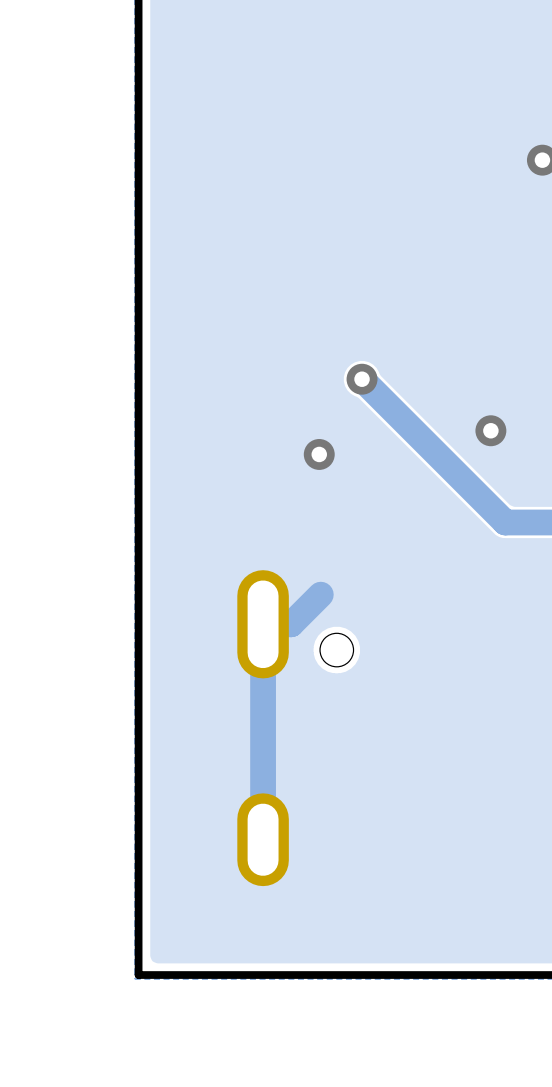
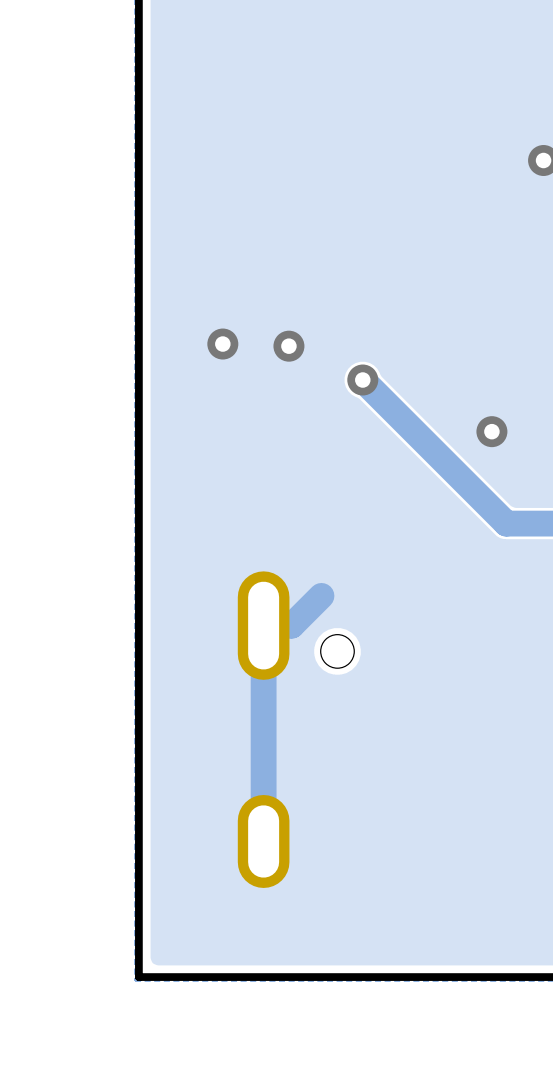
via: none -> (222, 344)
via: none -> (288, 346)
via: (319, 454) -> none

